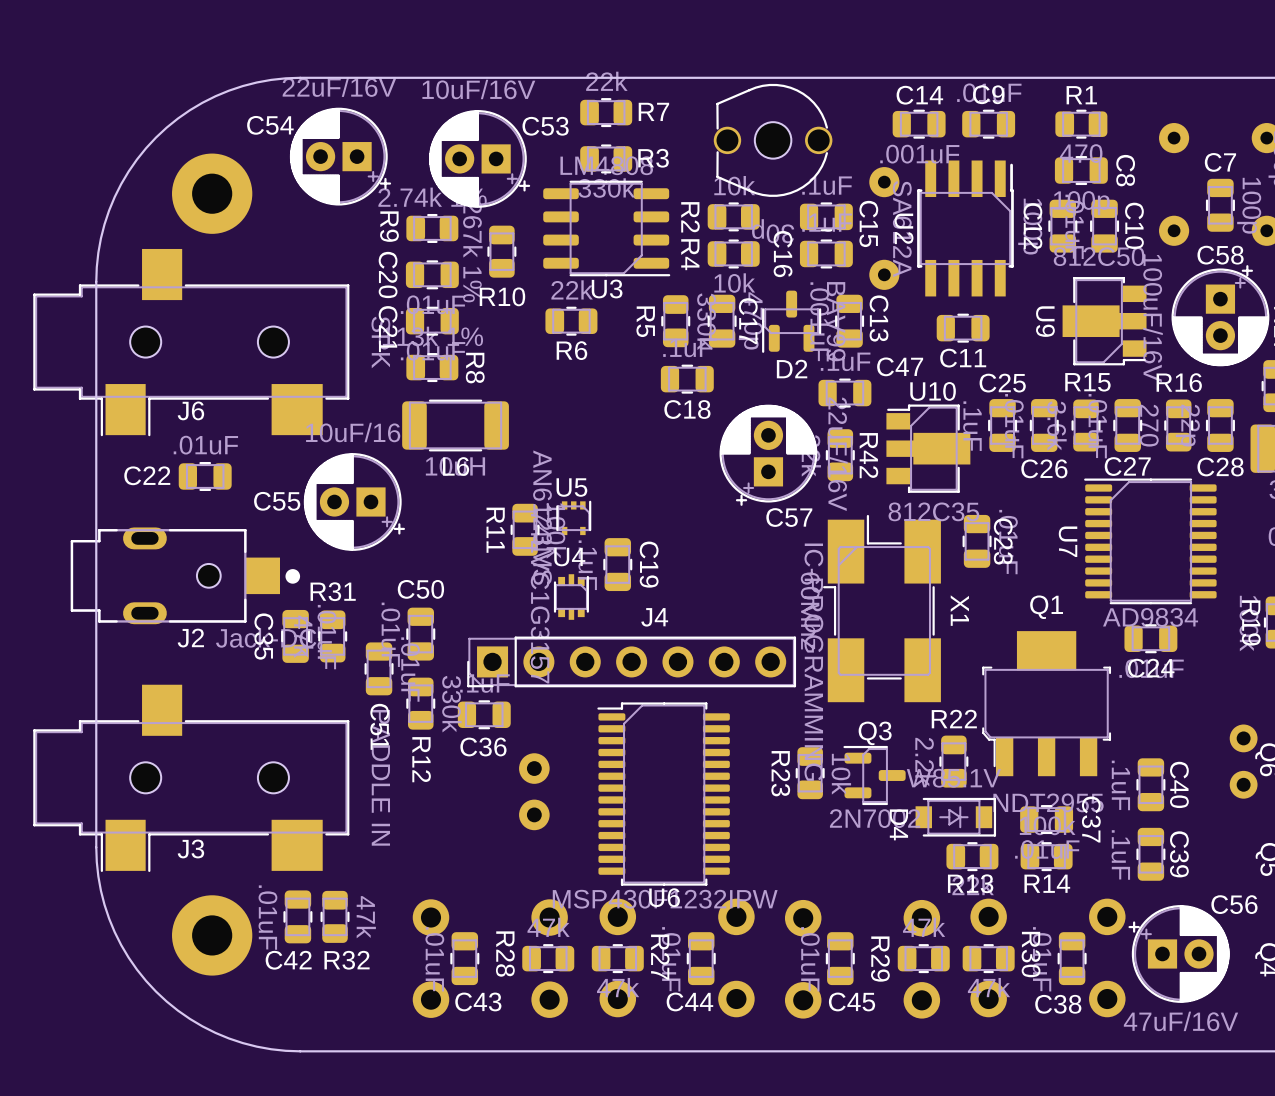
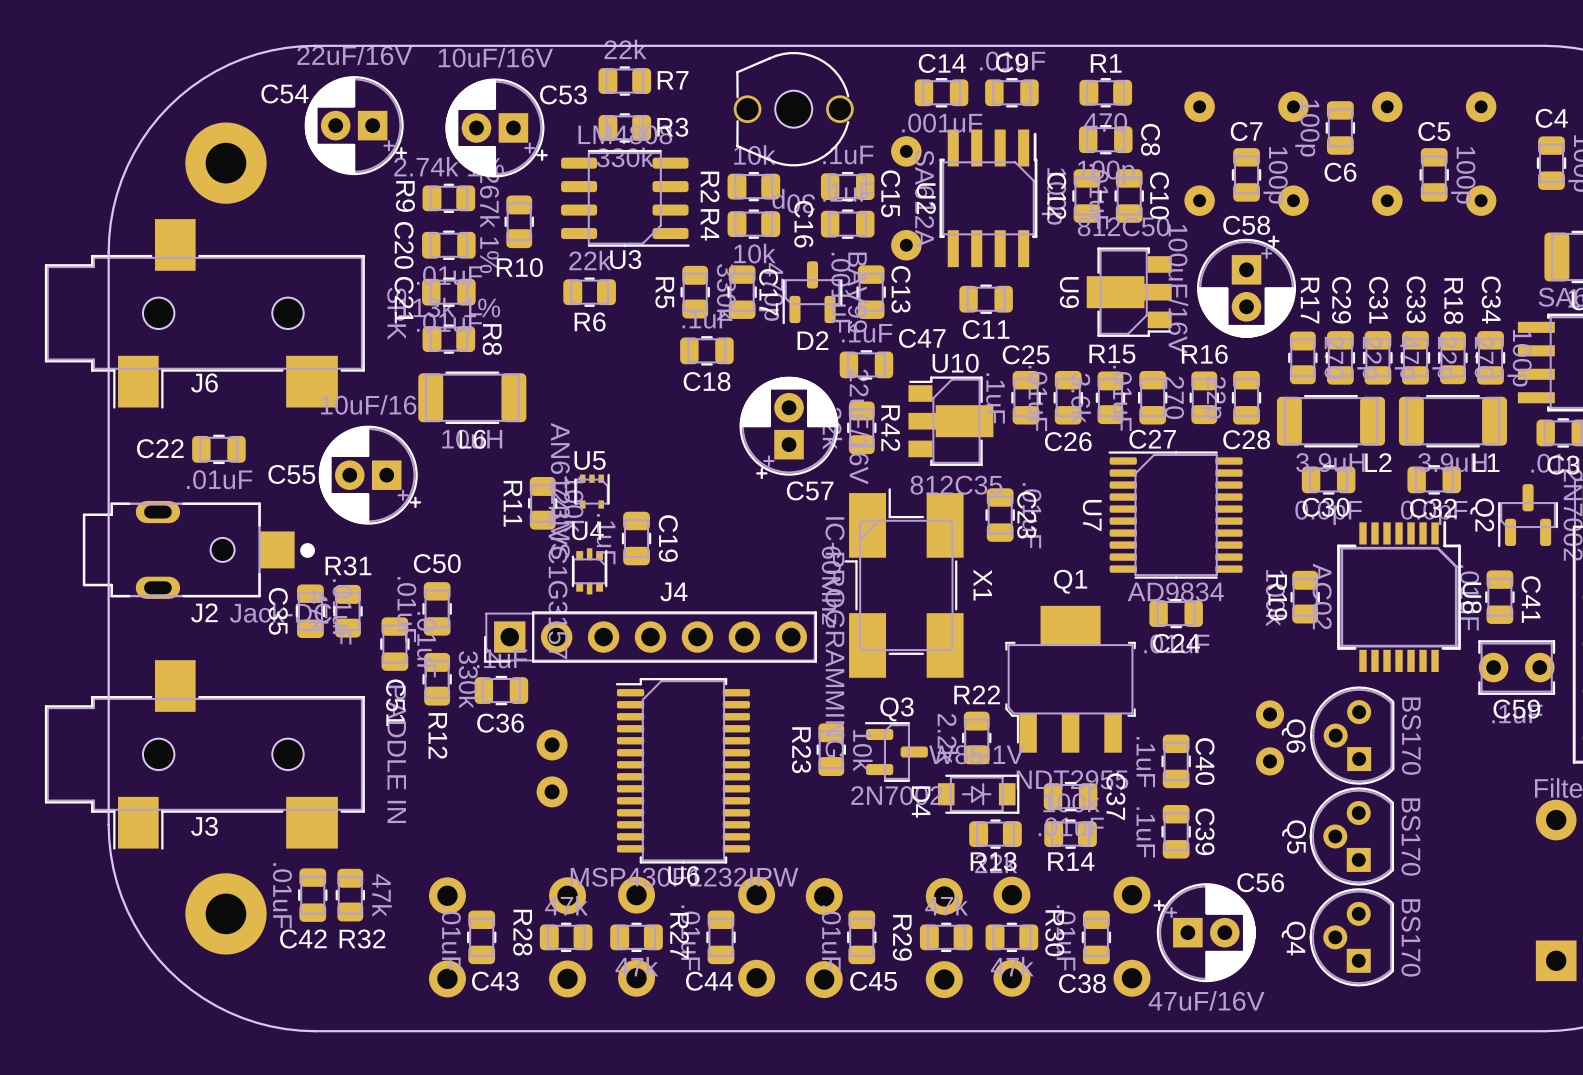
C22 value position: .01uF (205, 445) -> .01uF (219, 479)

